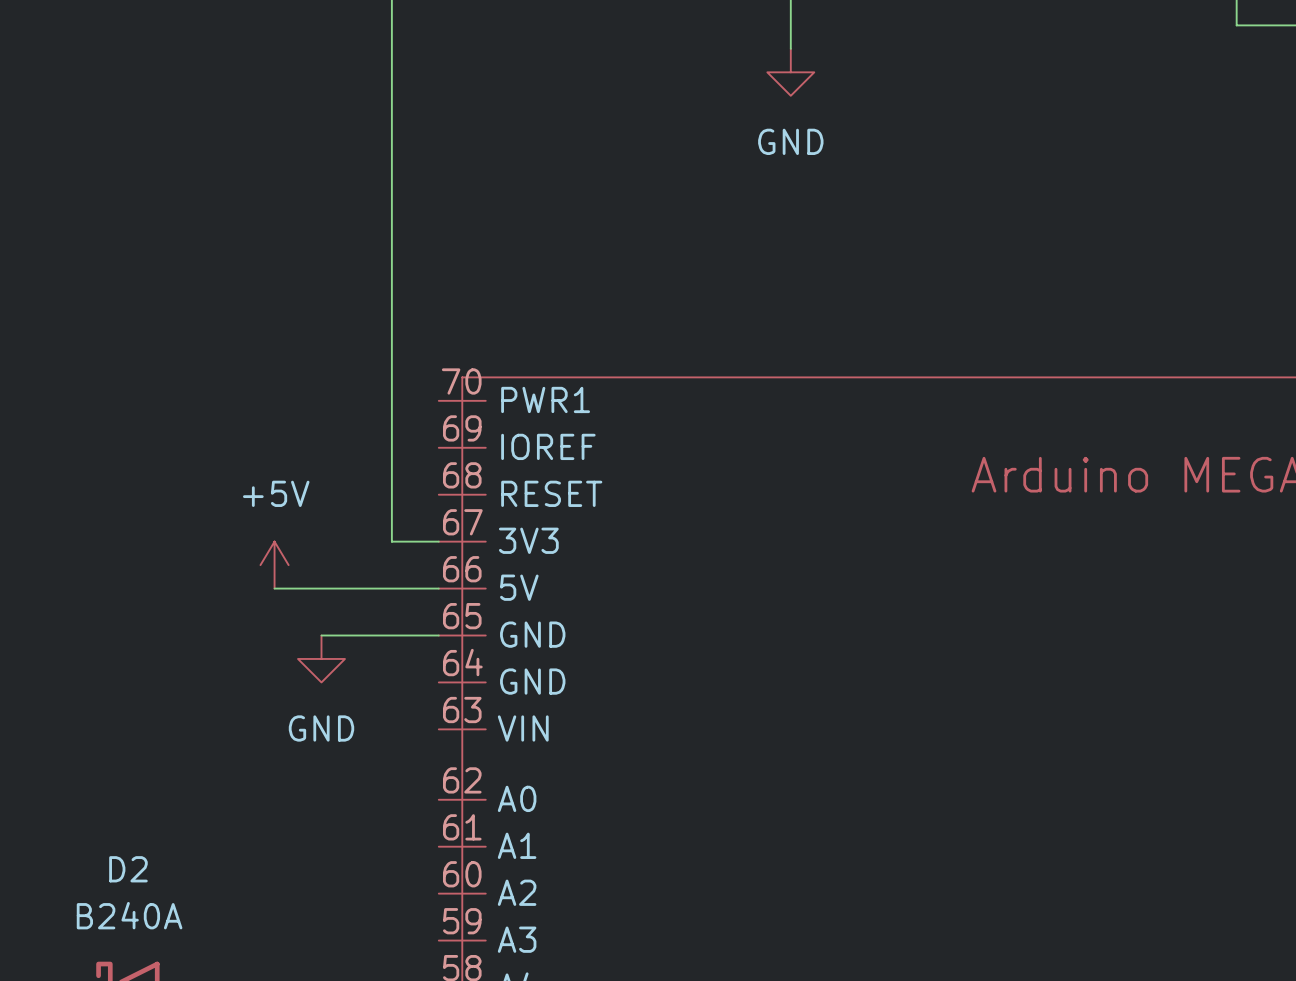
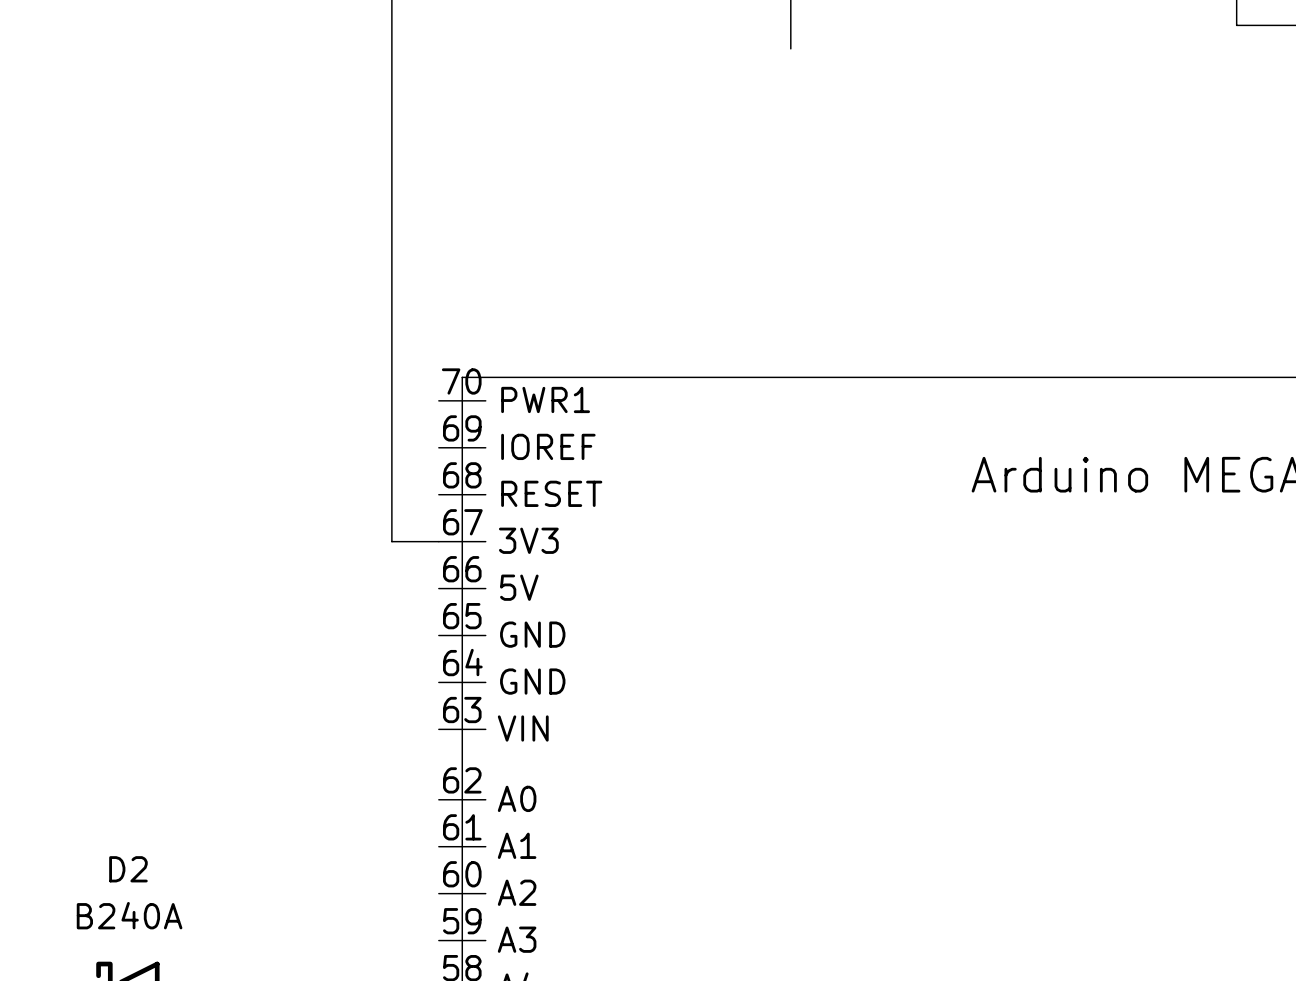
power symbol: GND (790, 72) -> none
power symbol: +5V (274, 565) -> none
wire: (274, 588) (438, 588) -> none
wire: (321, 635) (438, 635) -> none
power symbol: GND (321, 658) -> none

